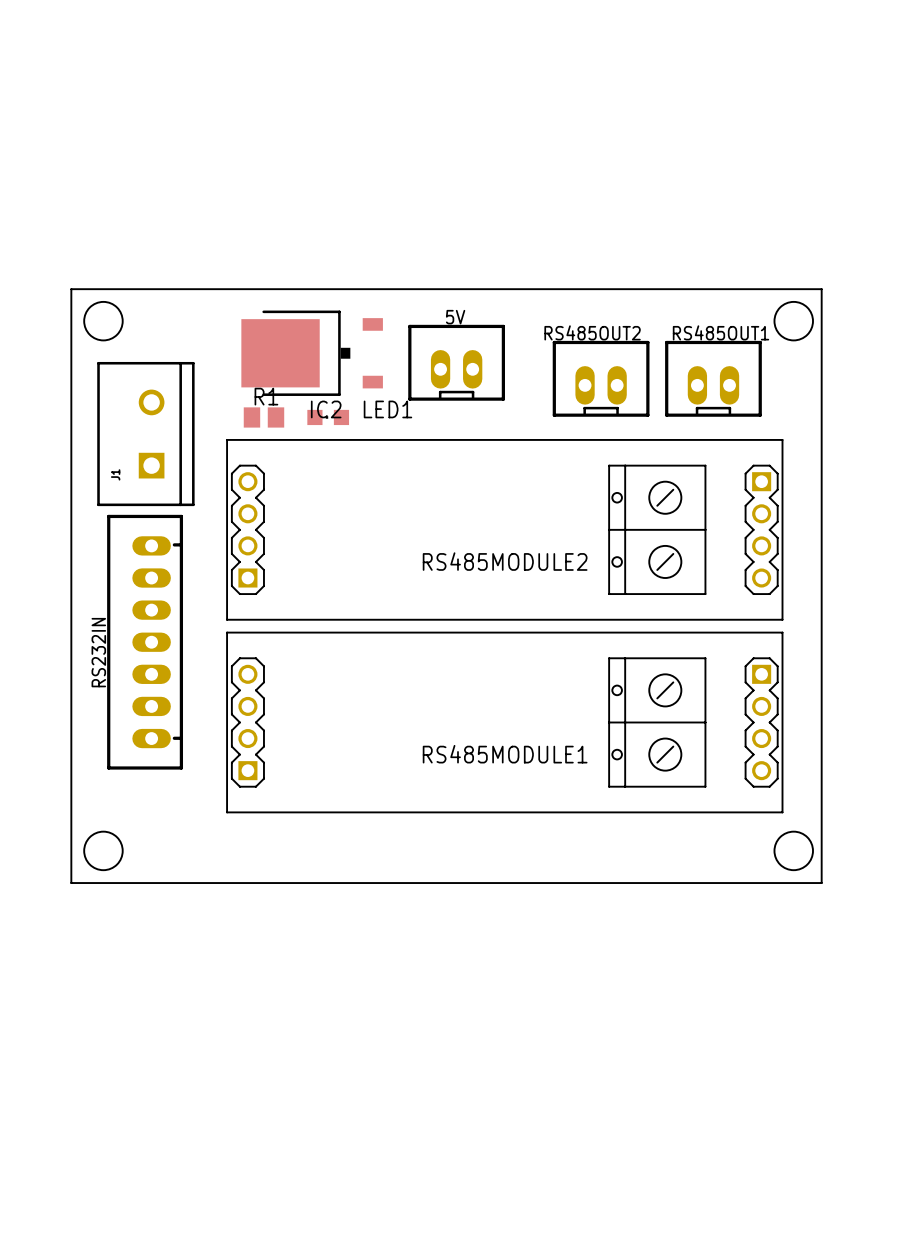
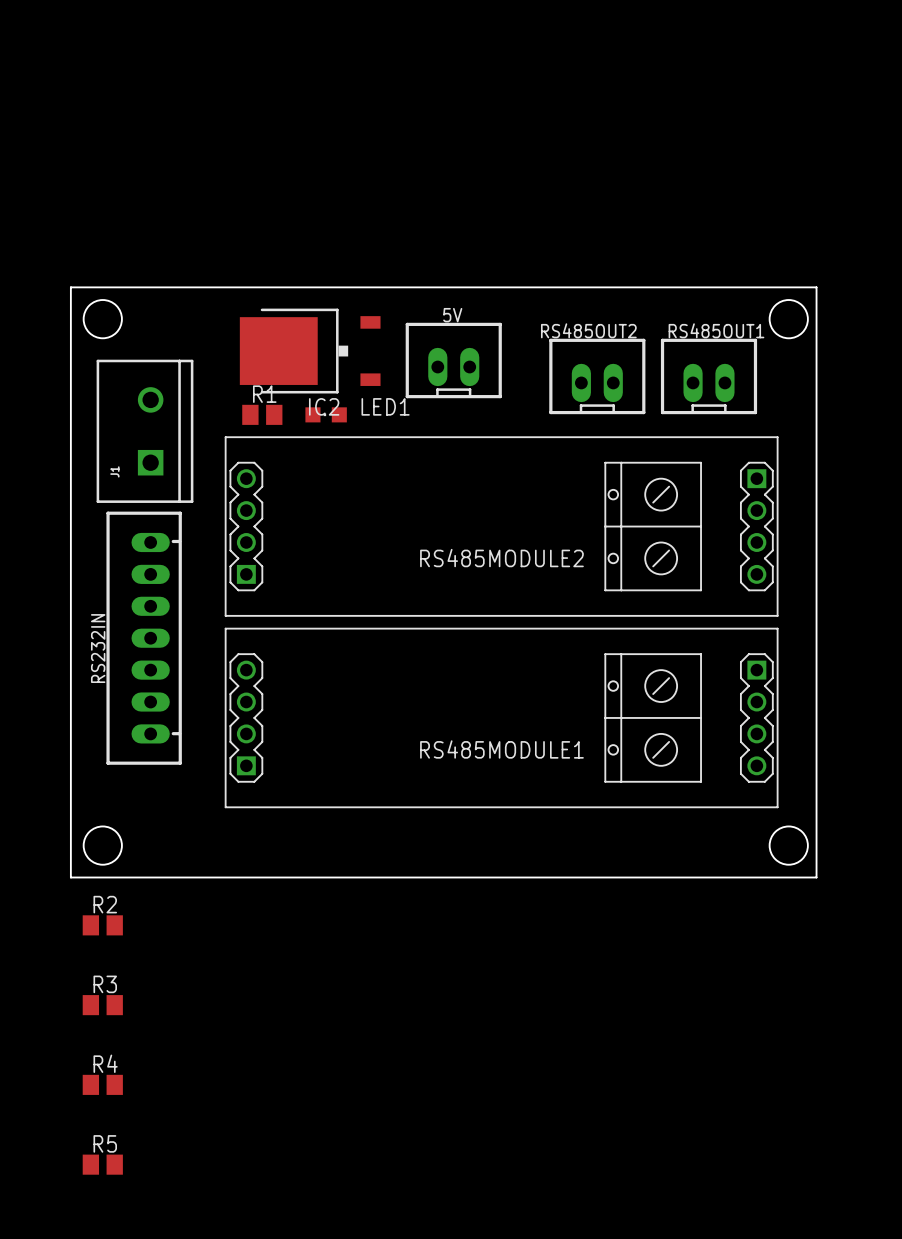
R2: none -> (102, 925)
R3: none -> (102, 1005)
R4: none -> (102, 1084)
R5: none -> (102, 1164)

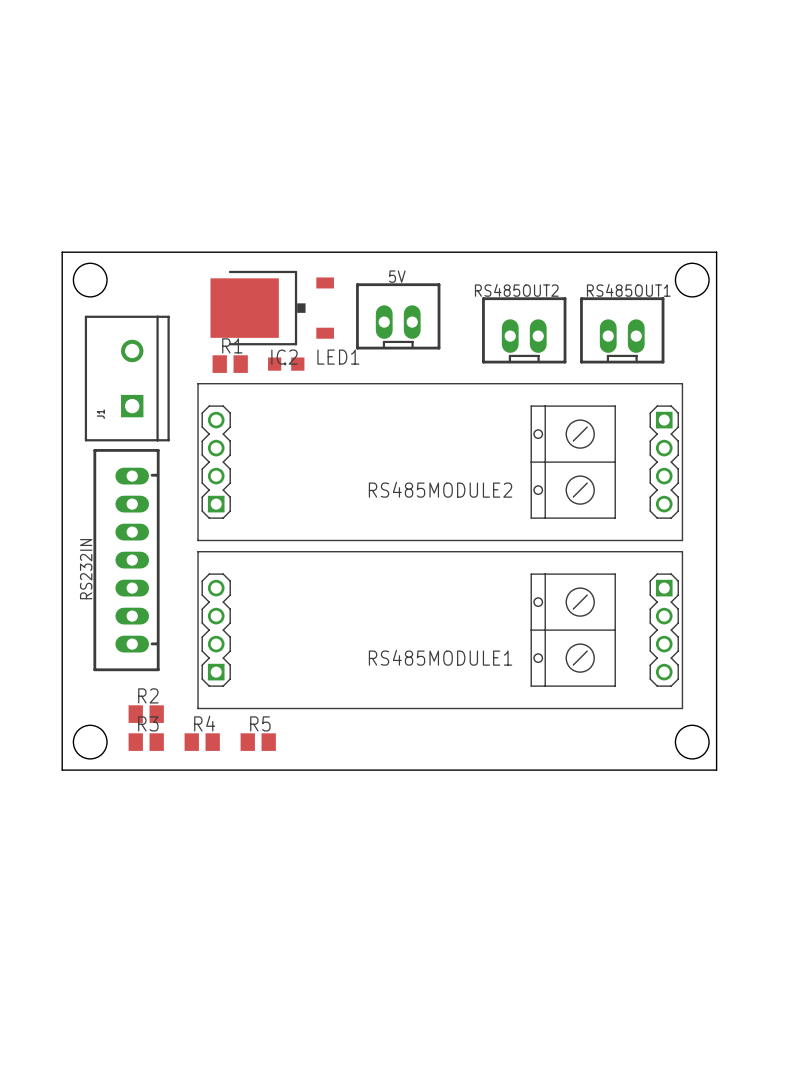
R2 position: (102, 925) -> (146, 714)
R3 position: (102, 1005) -> (146, 742)
R4 position: (102, 1084) -> (202, 742)
R5 position: (102, 1164) -> (258, 742)

